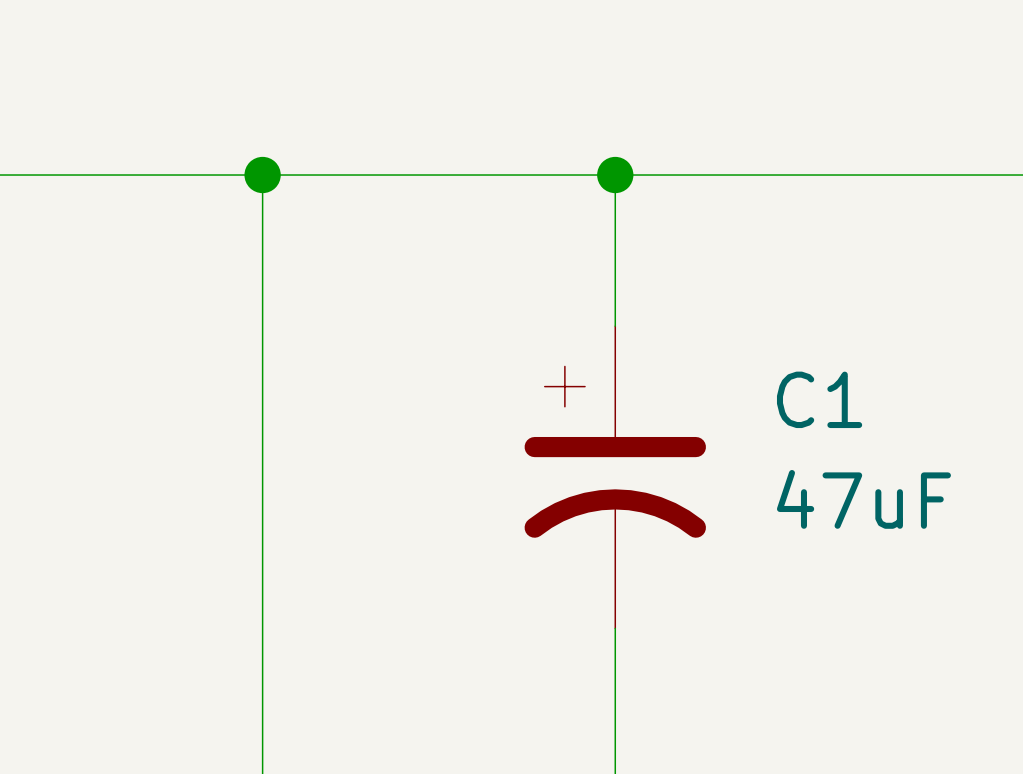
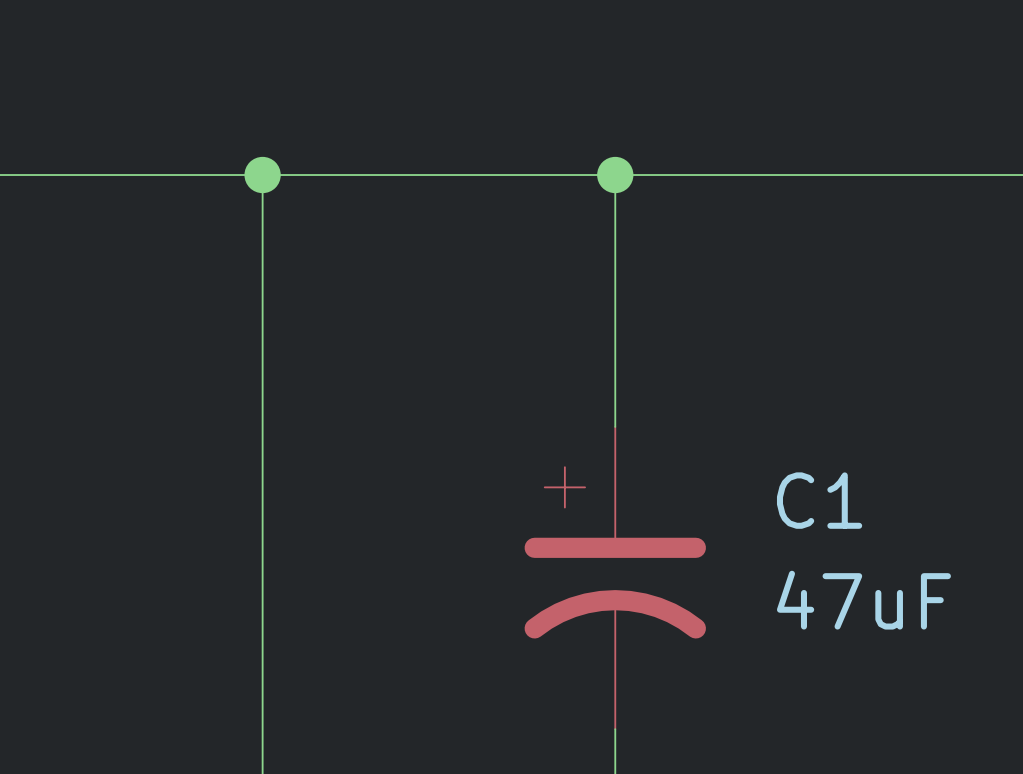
C1 position: (615, 477) -> (615, 578)

